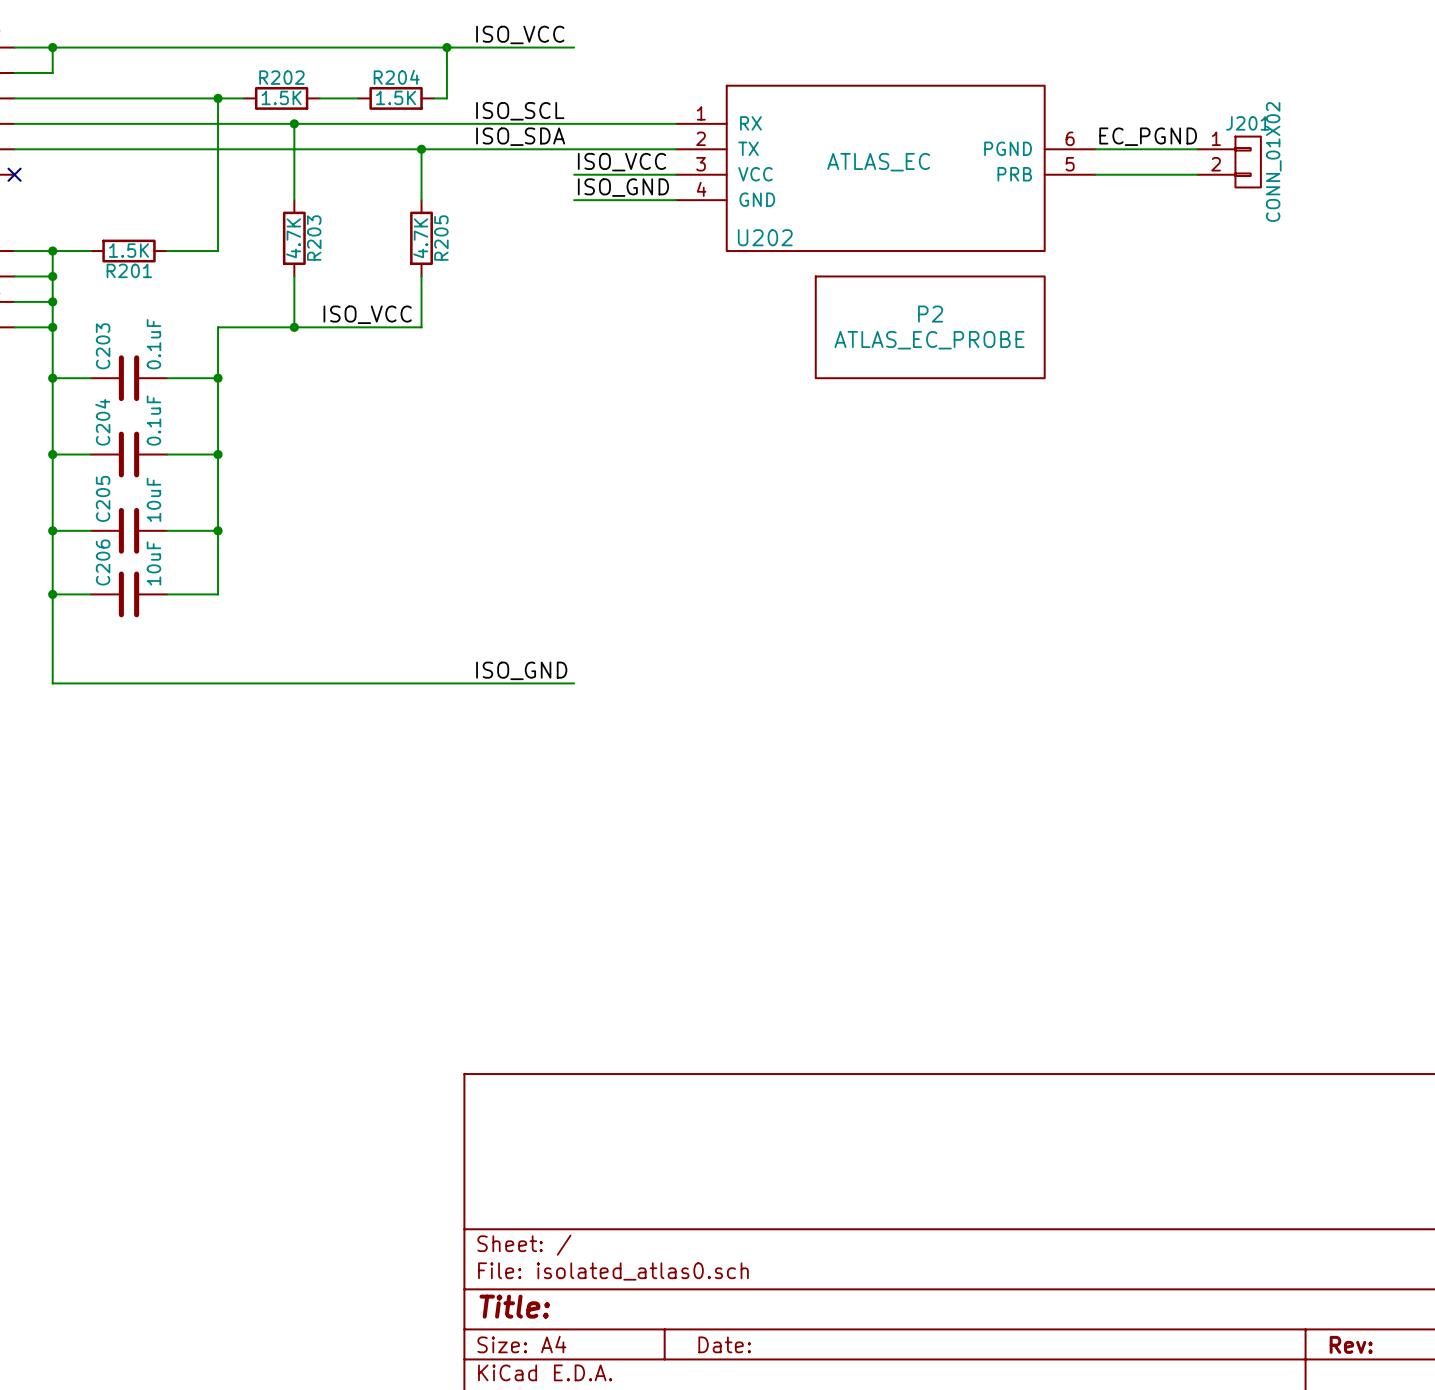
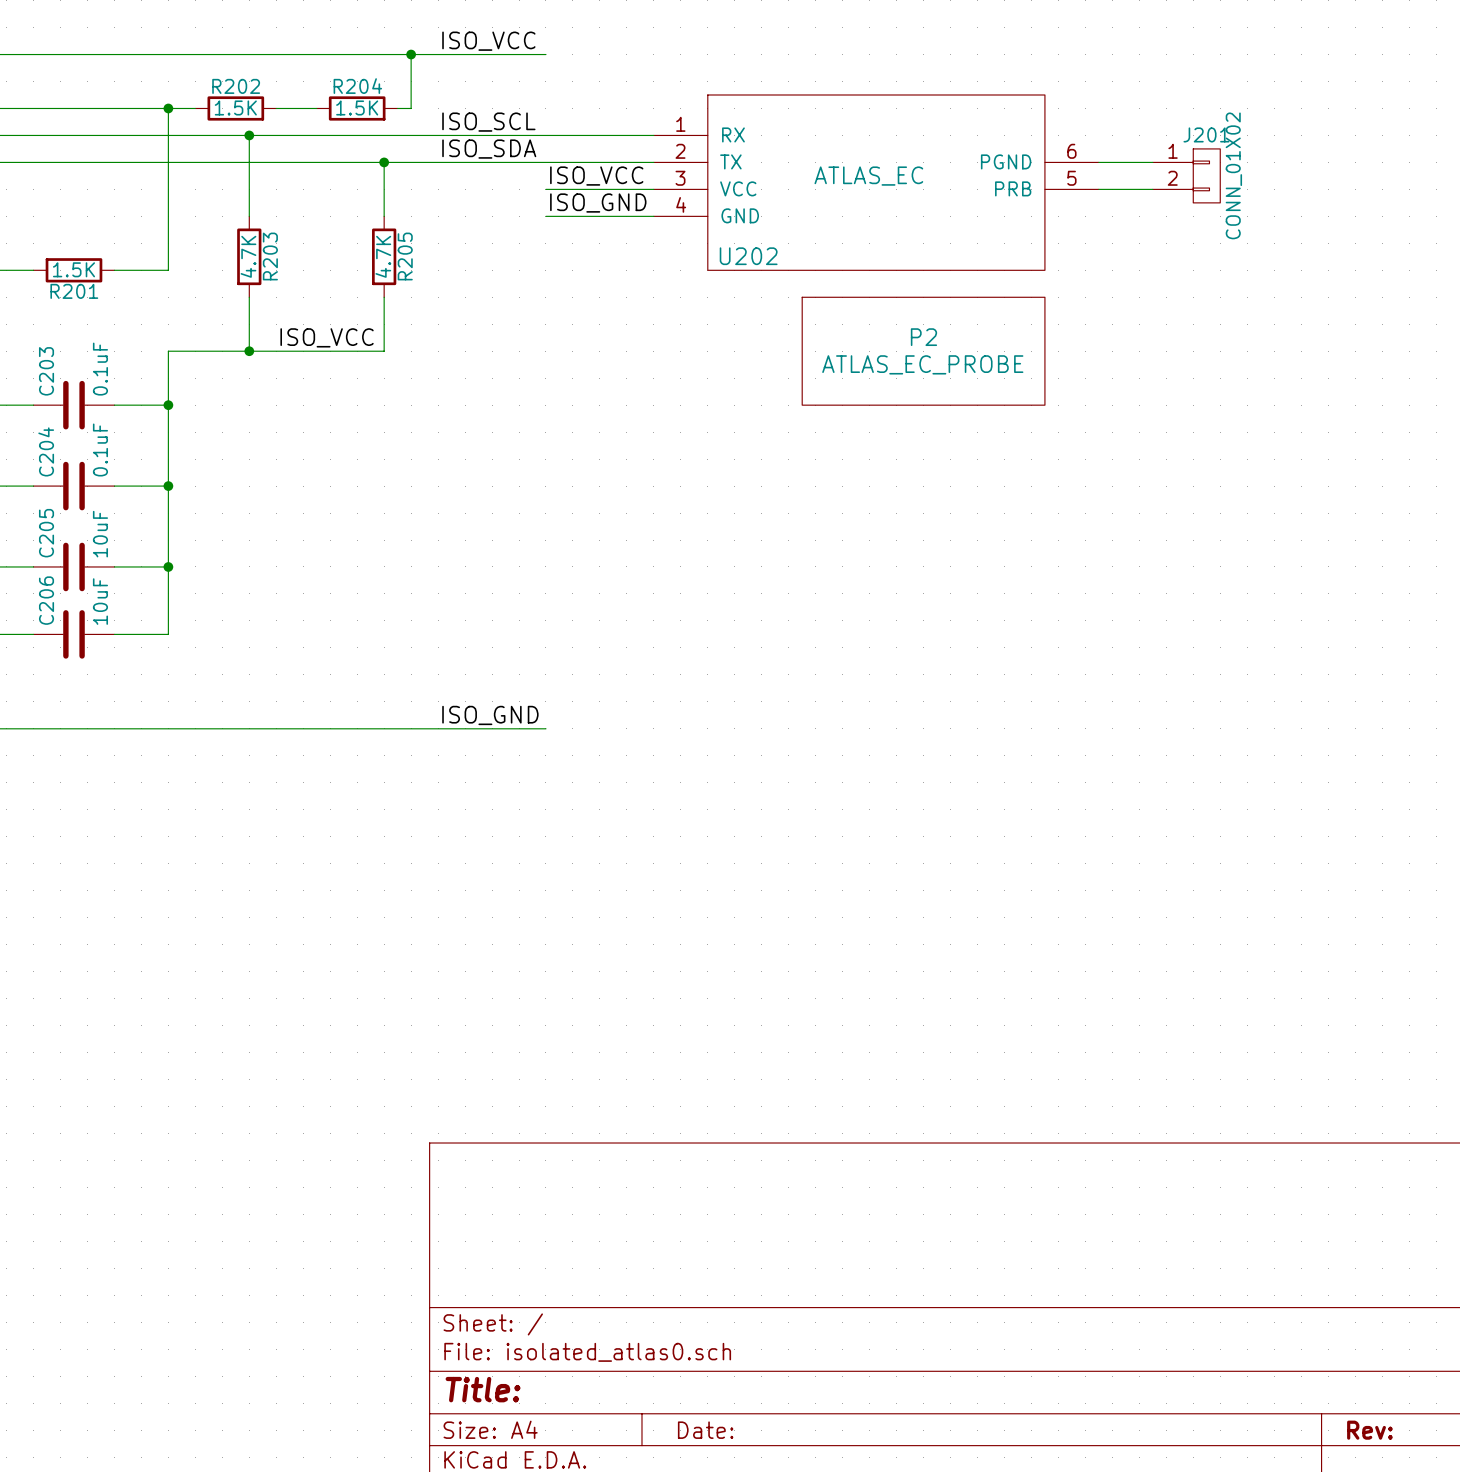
label: EC_PGND (1148, 136) -> none
J201 position: (1229, 162) -> (1186, 175)

